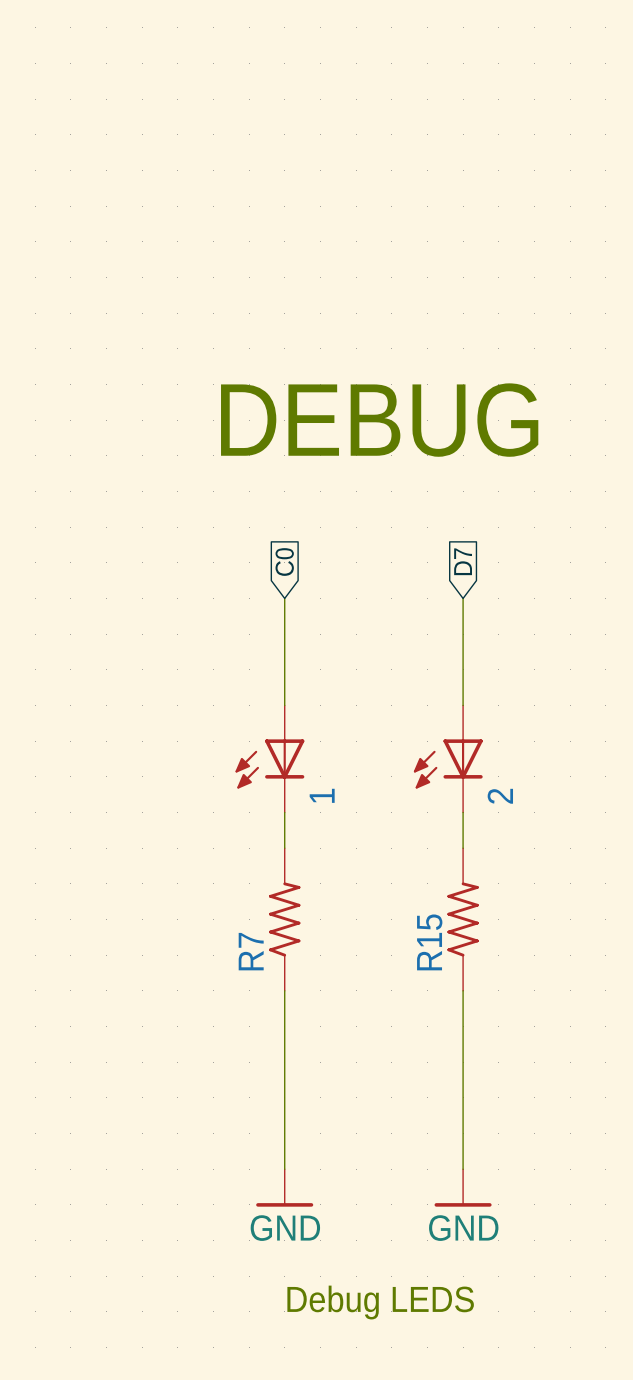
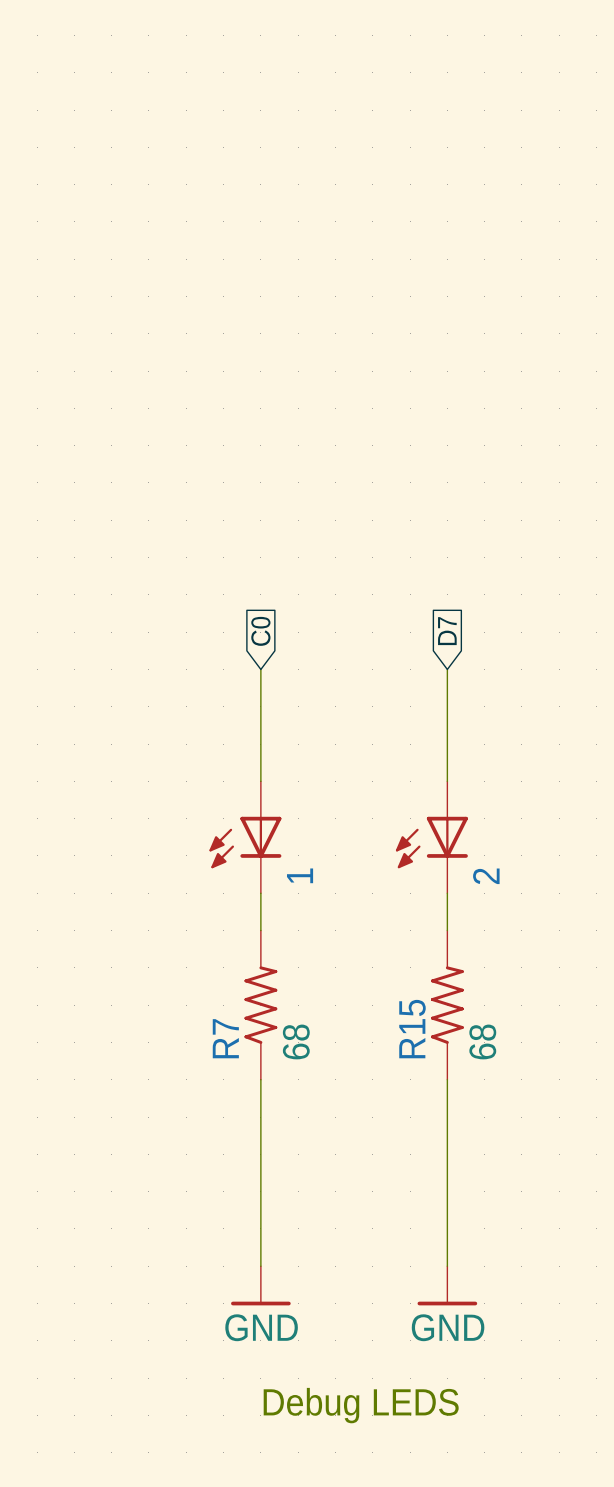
text: DEBUG (379, 420) -> none
R7 value: none -> 68 (296, 1041)
R15 value: none -> 68 (482, 1041)

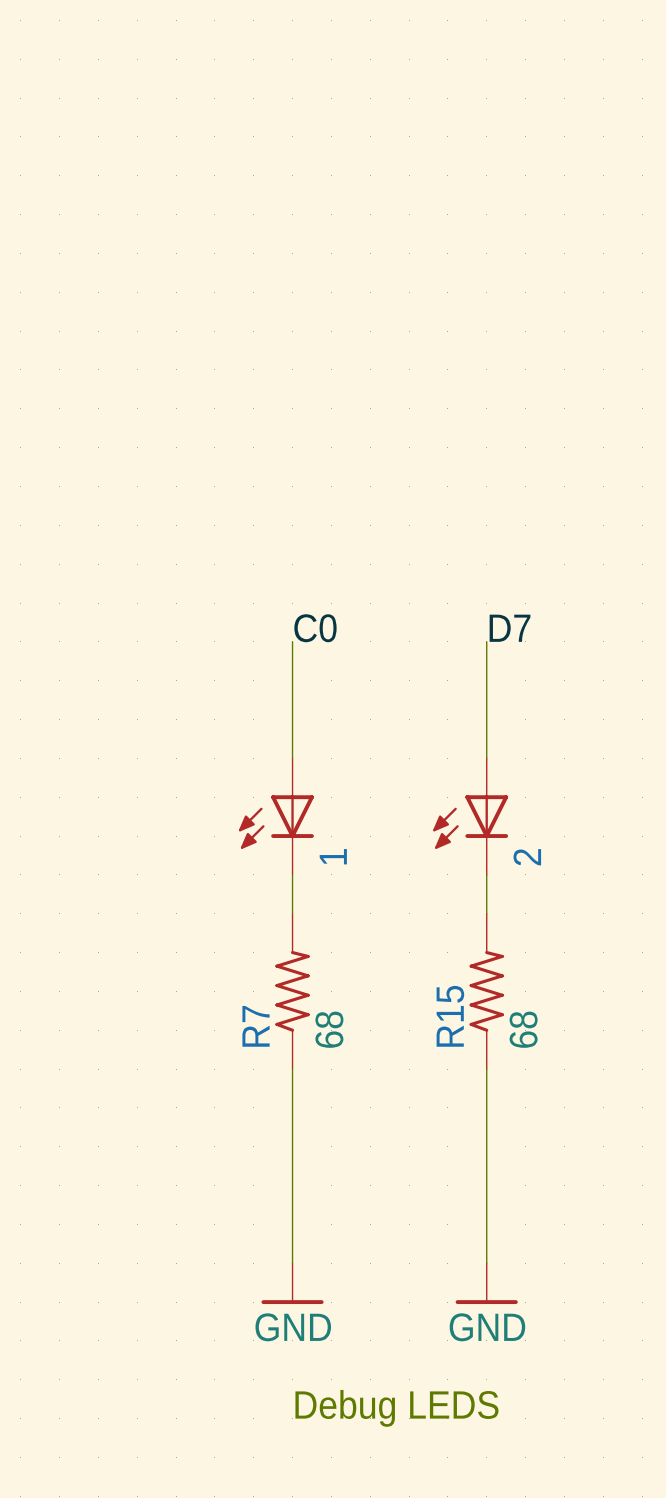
global label: C0 (260, 631) -> none
global label: D7 (447, 631) -> none
label: none -> C0 (315, 628)
label: none -> D7 (510, 628)

